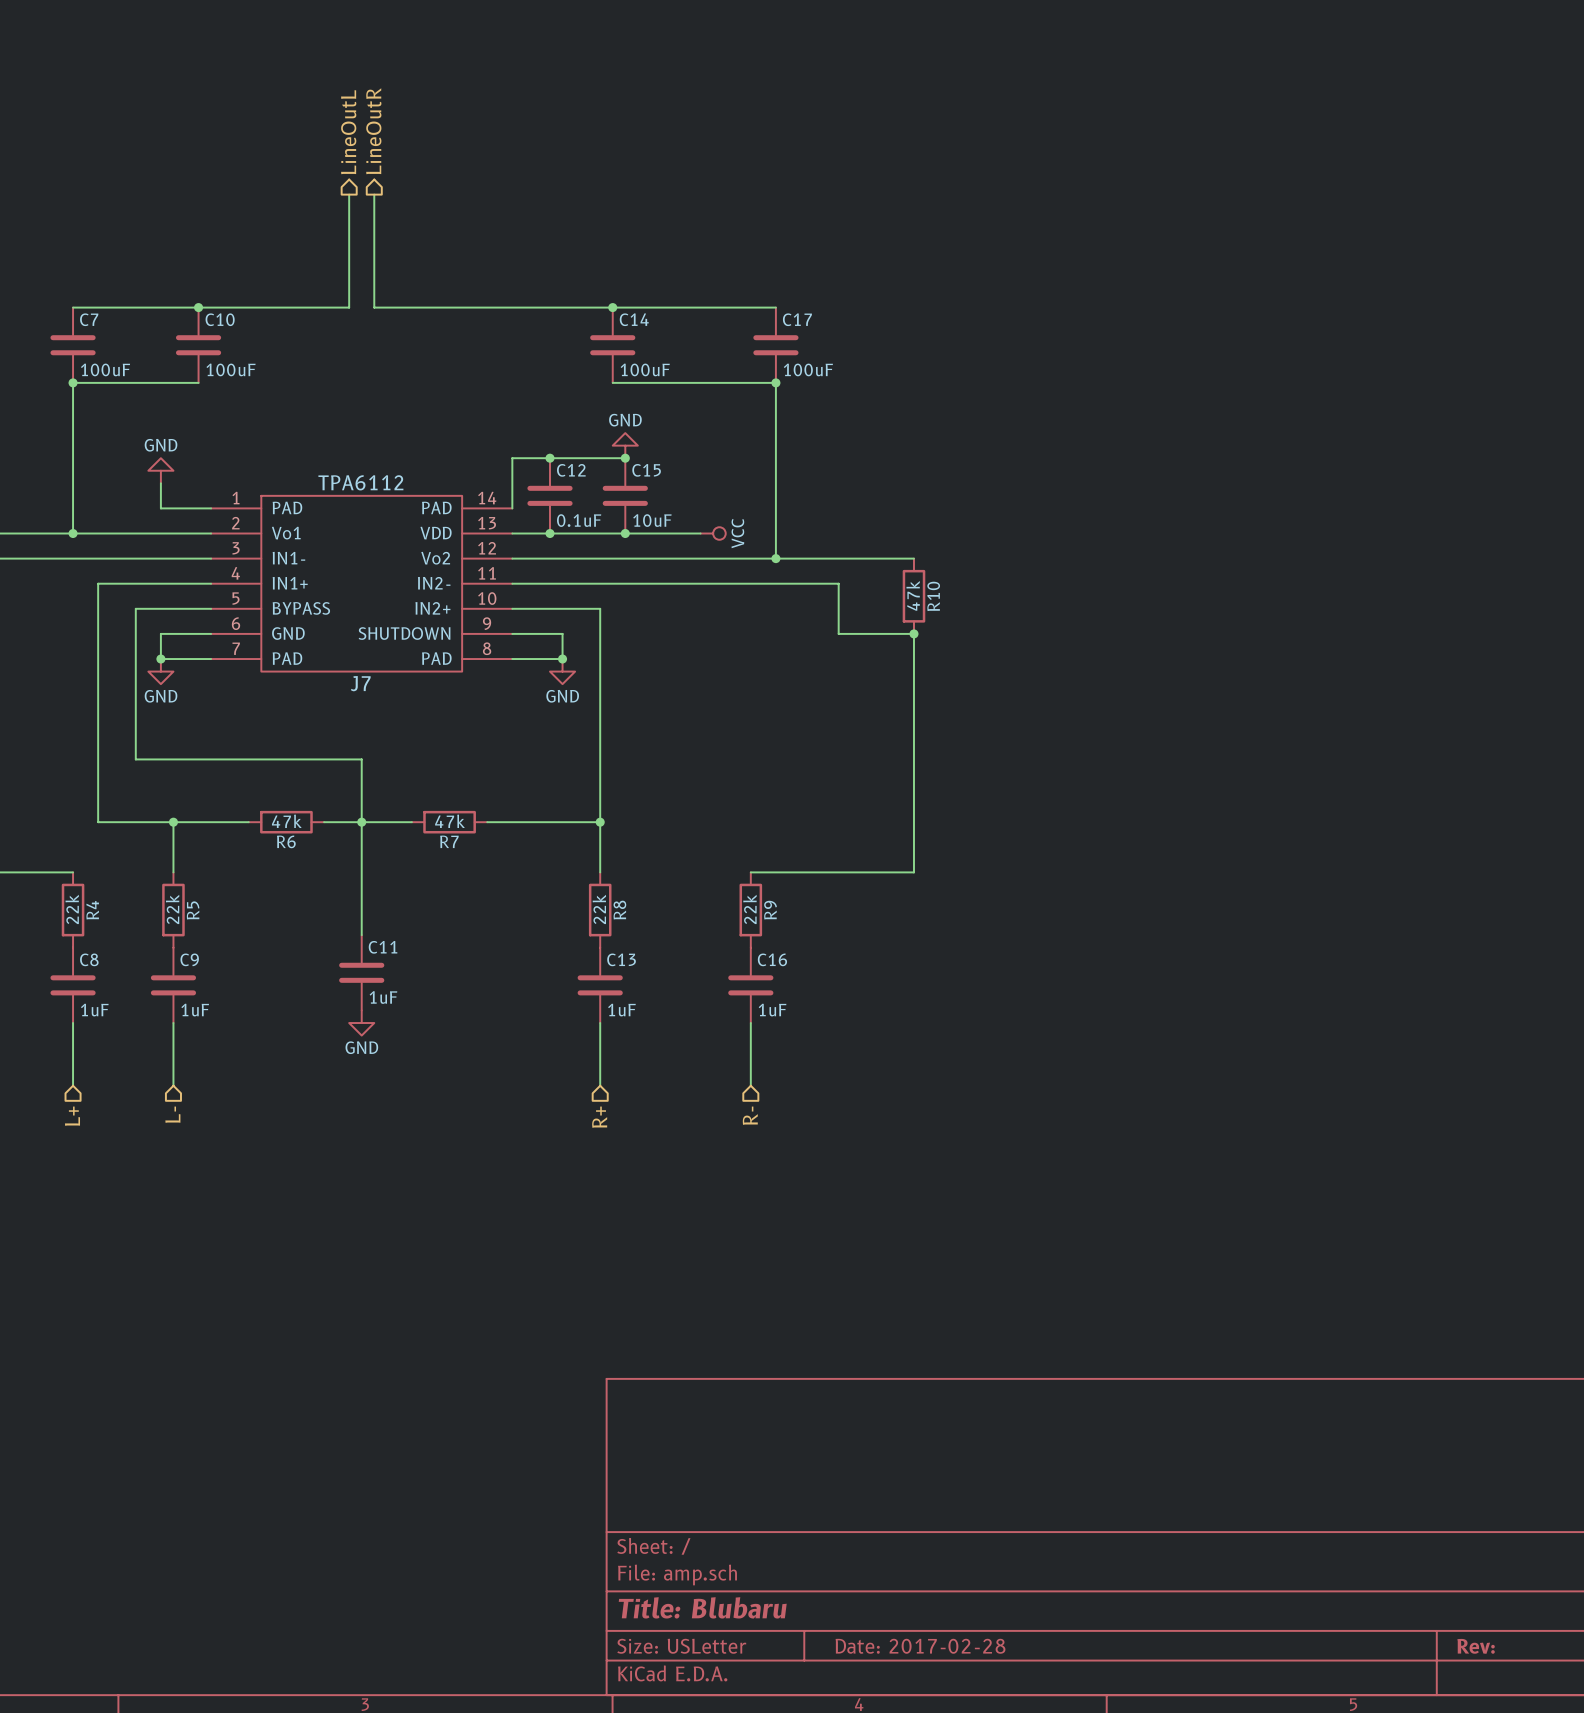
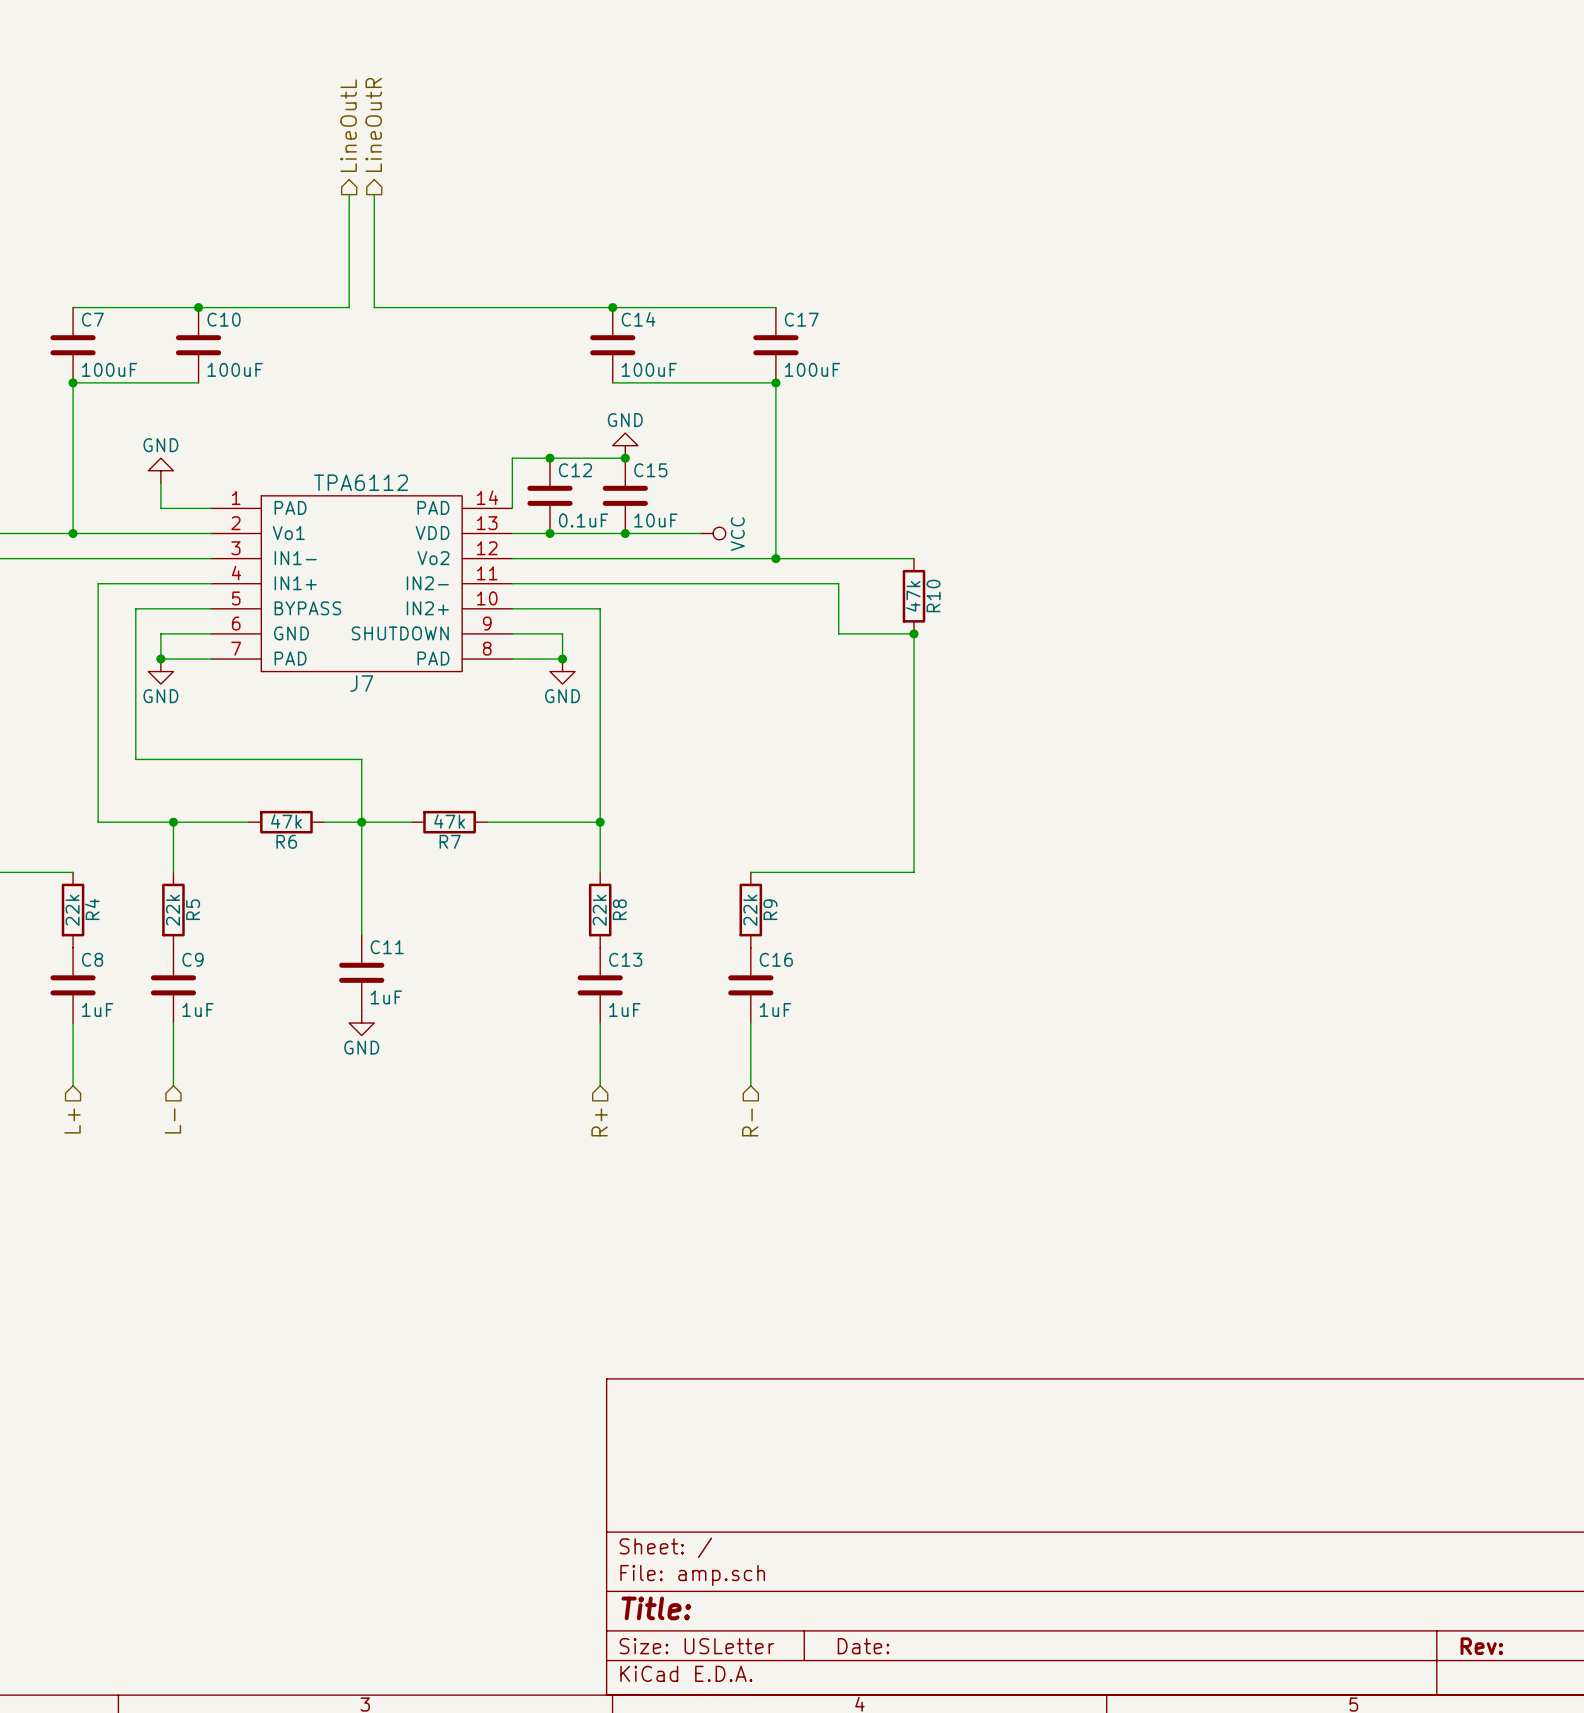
title block: Title: Blubaru (702, 1607) -> Title: (656, 1608)
title block: Date: 2017-02-28 (920, 1646) -> Date: (863, 1646)

